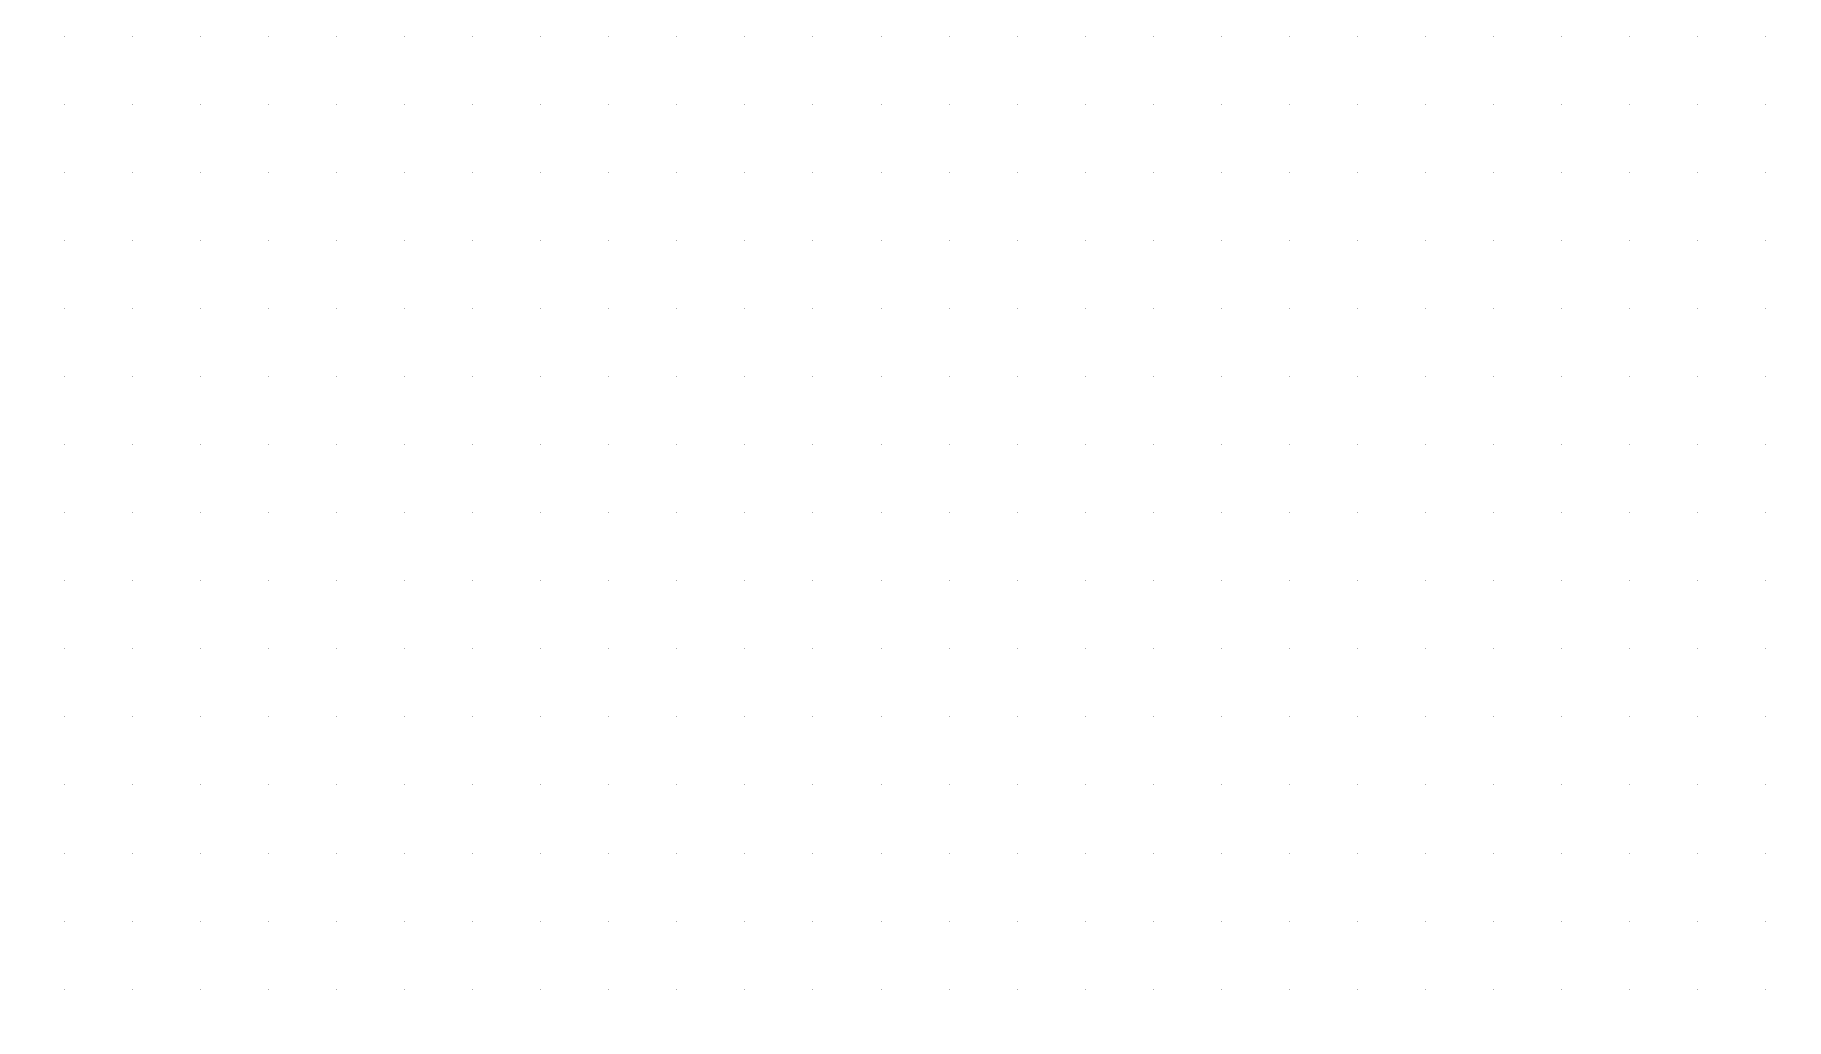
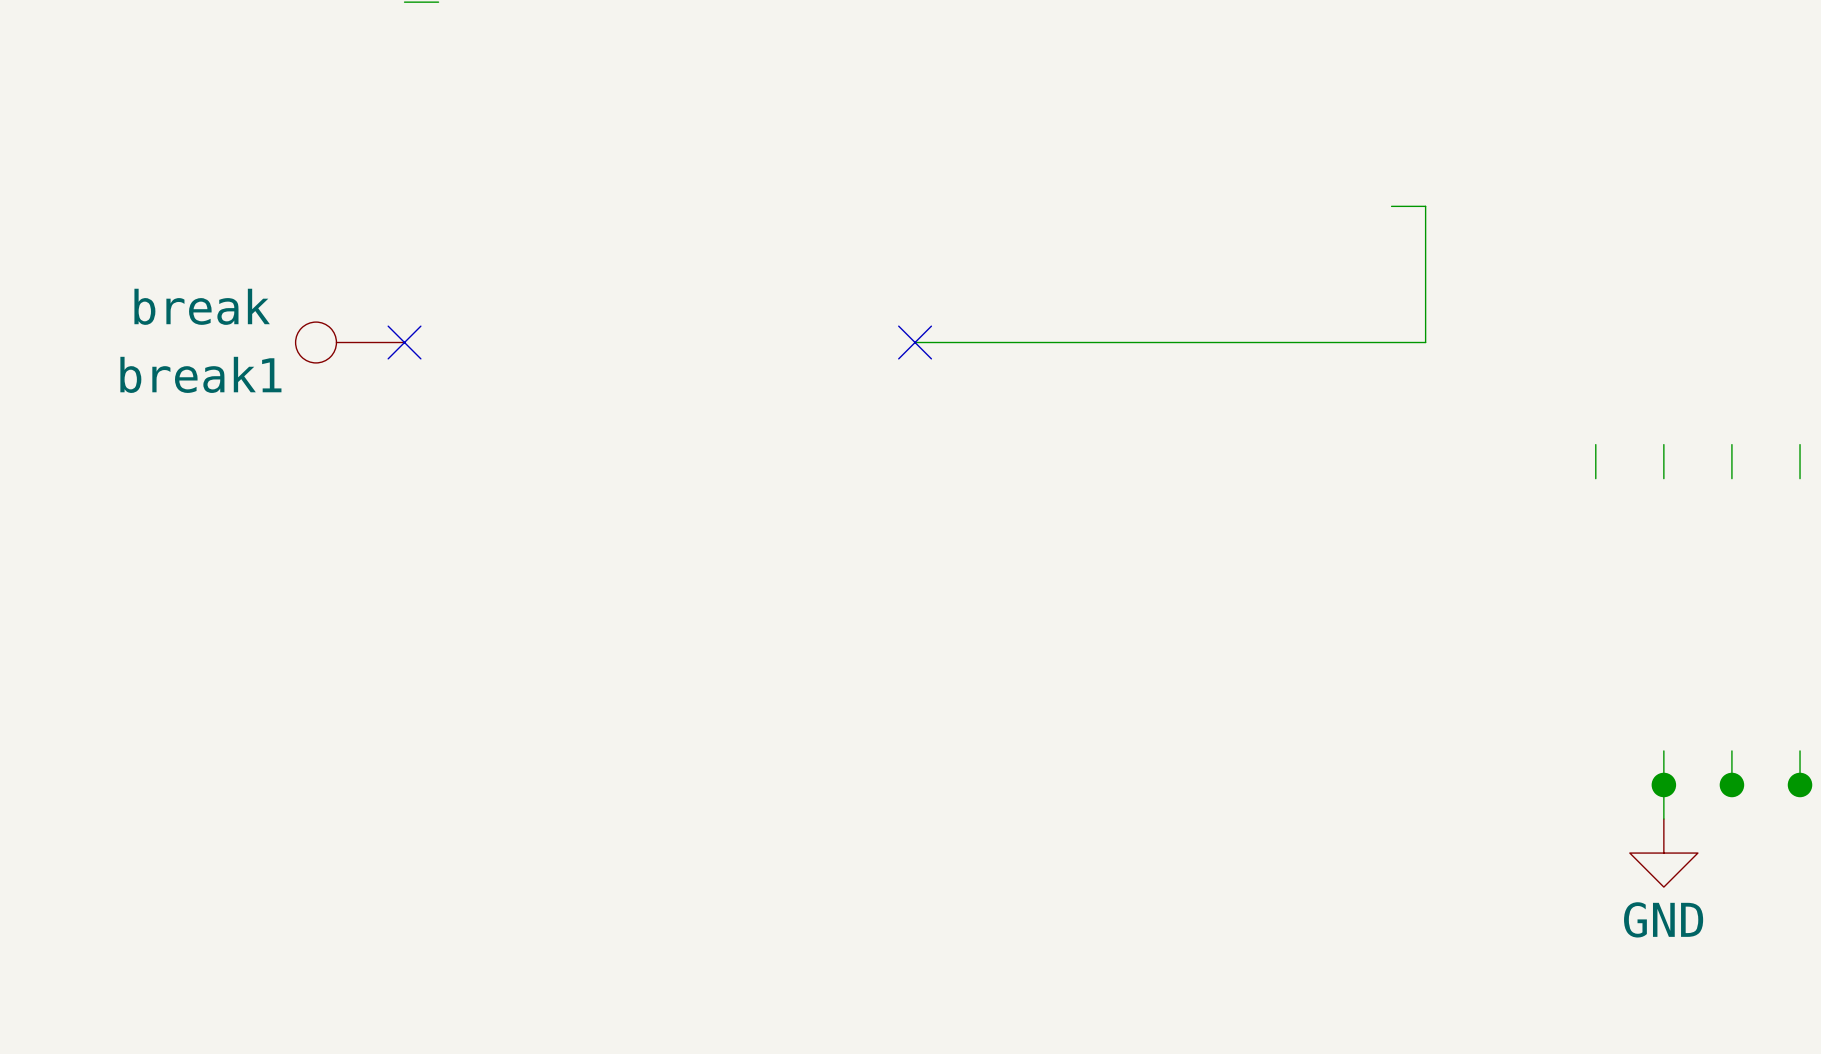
wire: none -> (404, 2) (438, 2)
wire: none -> (1391, 206) (1425, 206) (1425, 342) (915, 342)
break1: none -> break (350, 342)
no-connect mark: none -> (404, 342)
no-connect mark: none -> (915, 342)
wire: none -> (1595, 444) (1595, 478)
wire: none -> (1663, 444) (1663, 478)
wire: none -> (1731, 444) (1731, 478)
wire: none -> (1800, 444) (1800, 478)
wire: none -> (1663, 750) (1663, 819)
wire: none -> (1731, 750) (1731, 784)
wire: none -> (1800, 750) (1800, 784)
junction: none -> (1663, 784)
junction: none -> (1731, 784)
junction: none -> (1800, 784)
power symbol: none -> GND (1663, 853)

